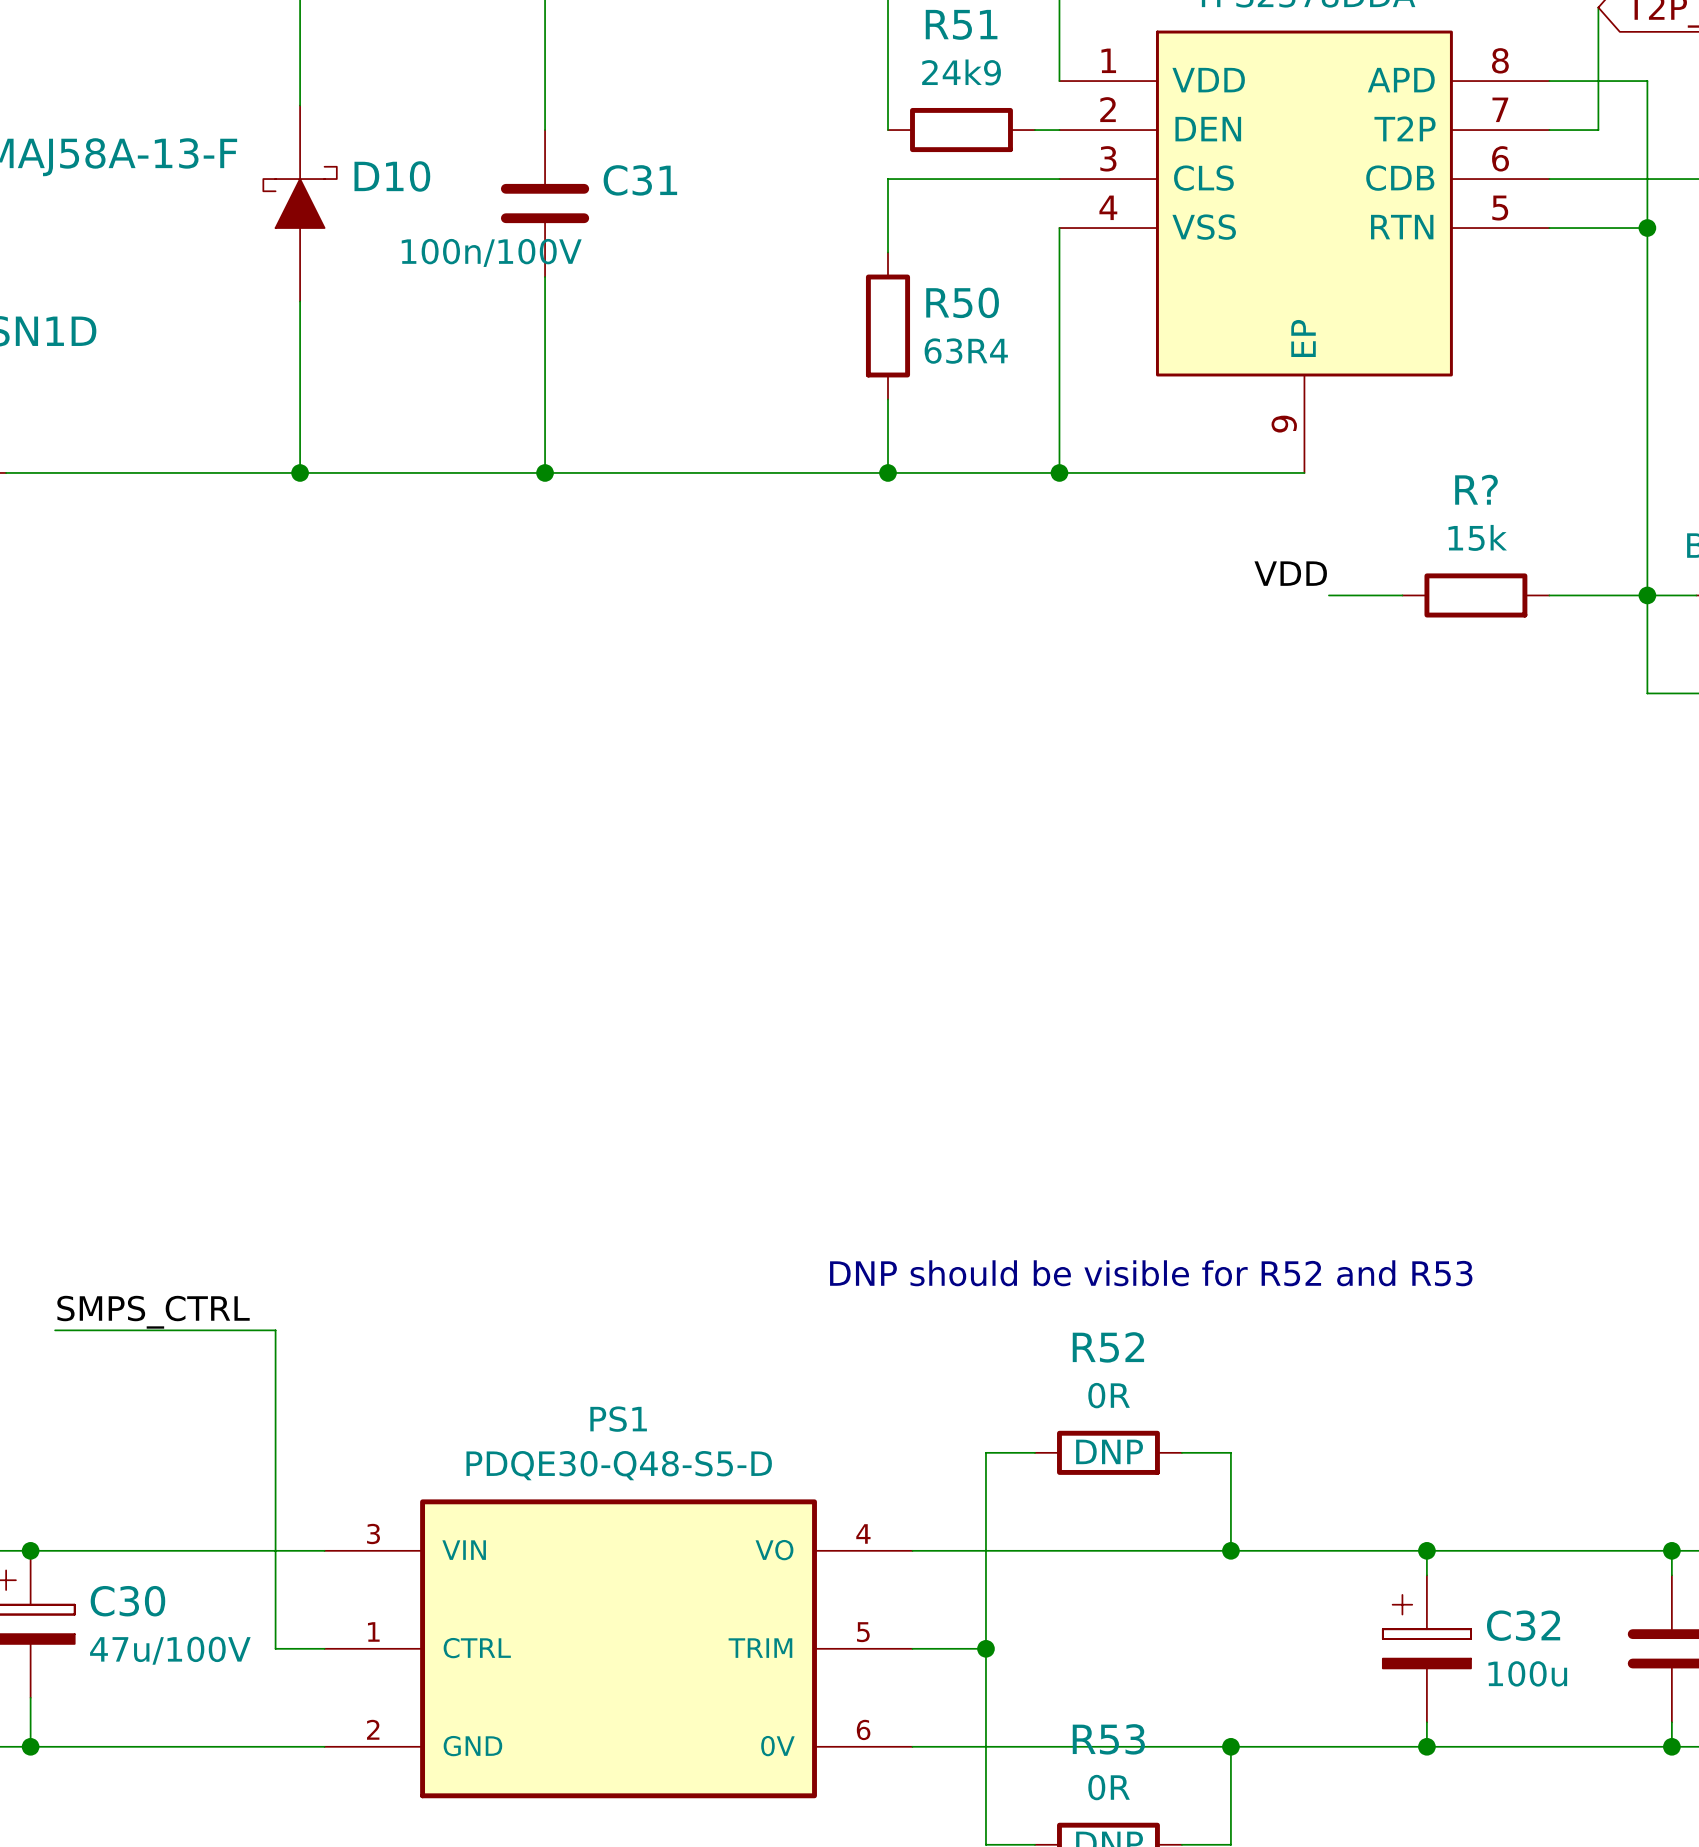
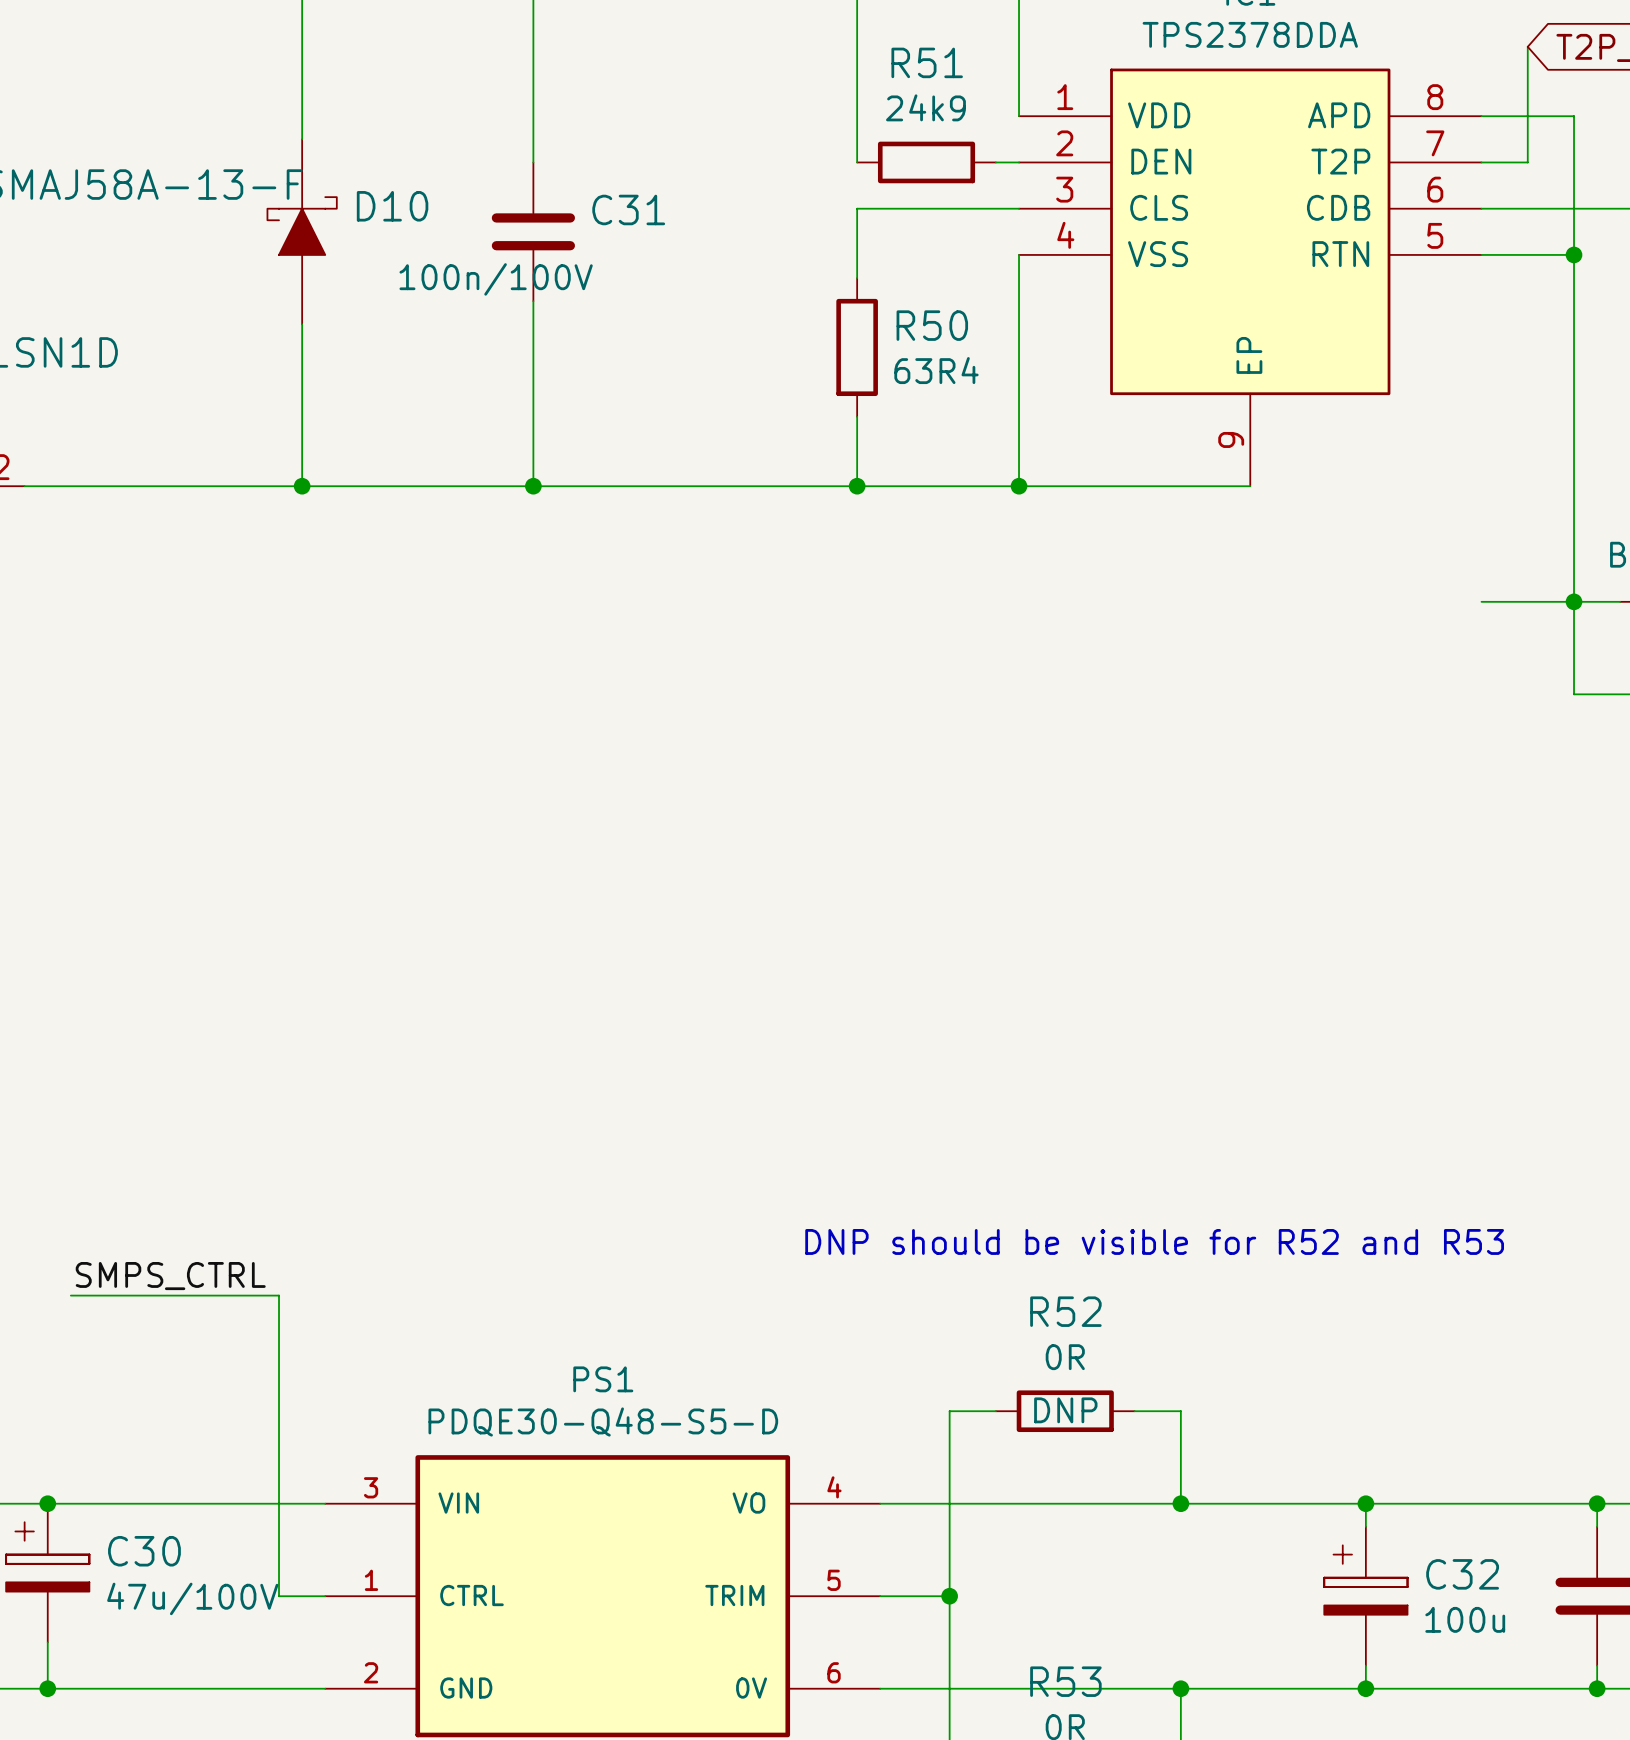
label: VDD (1290, 573) -> none
wire: (1328, 595) (1402, 595) -> none
R?: (1475, 595) -> none

